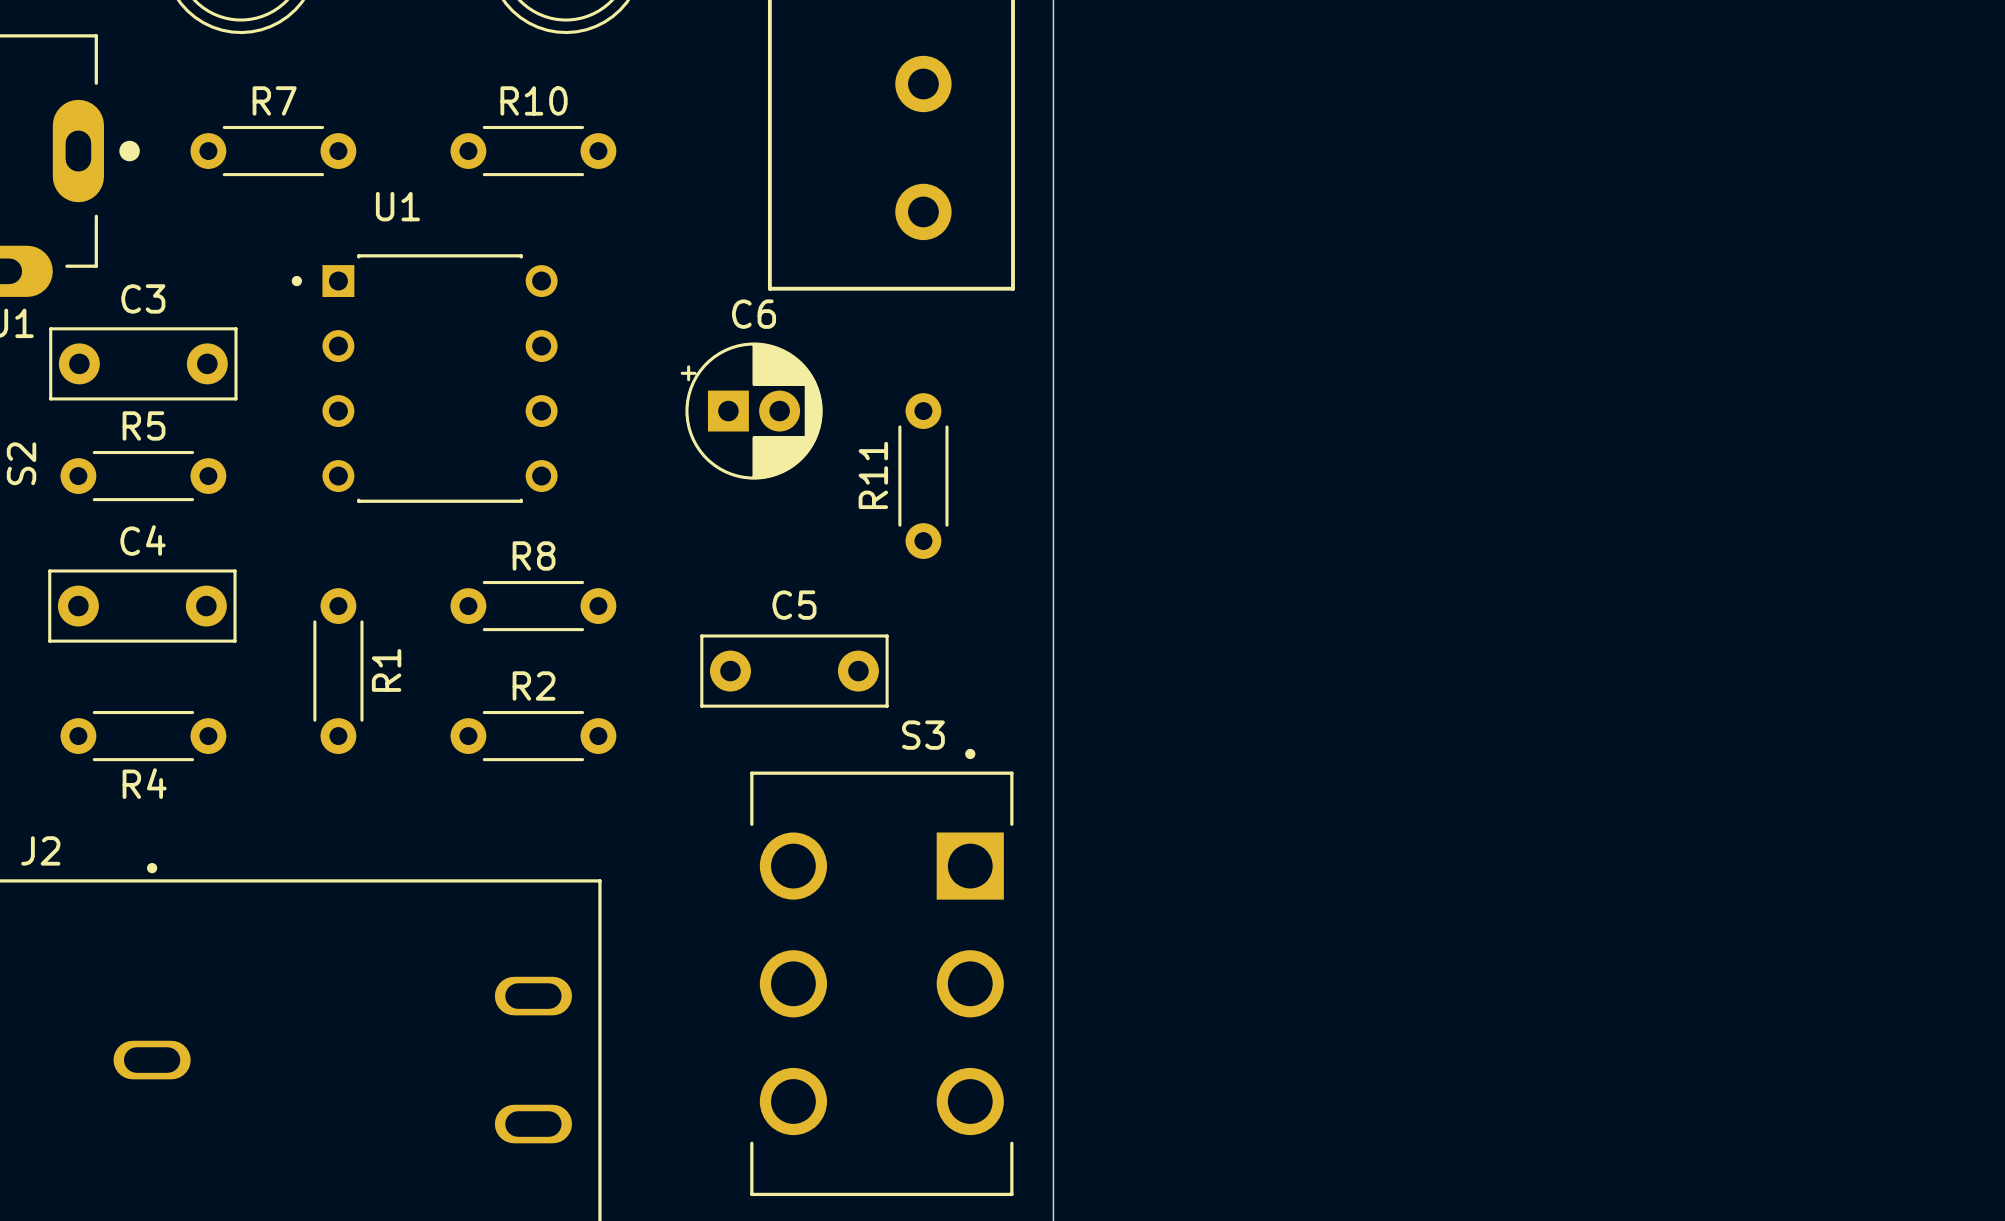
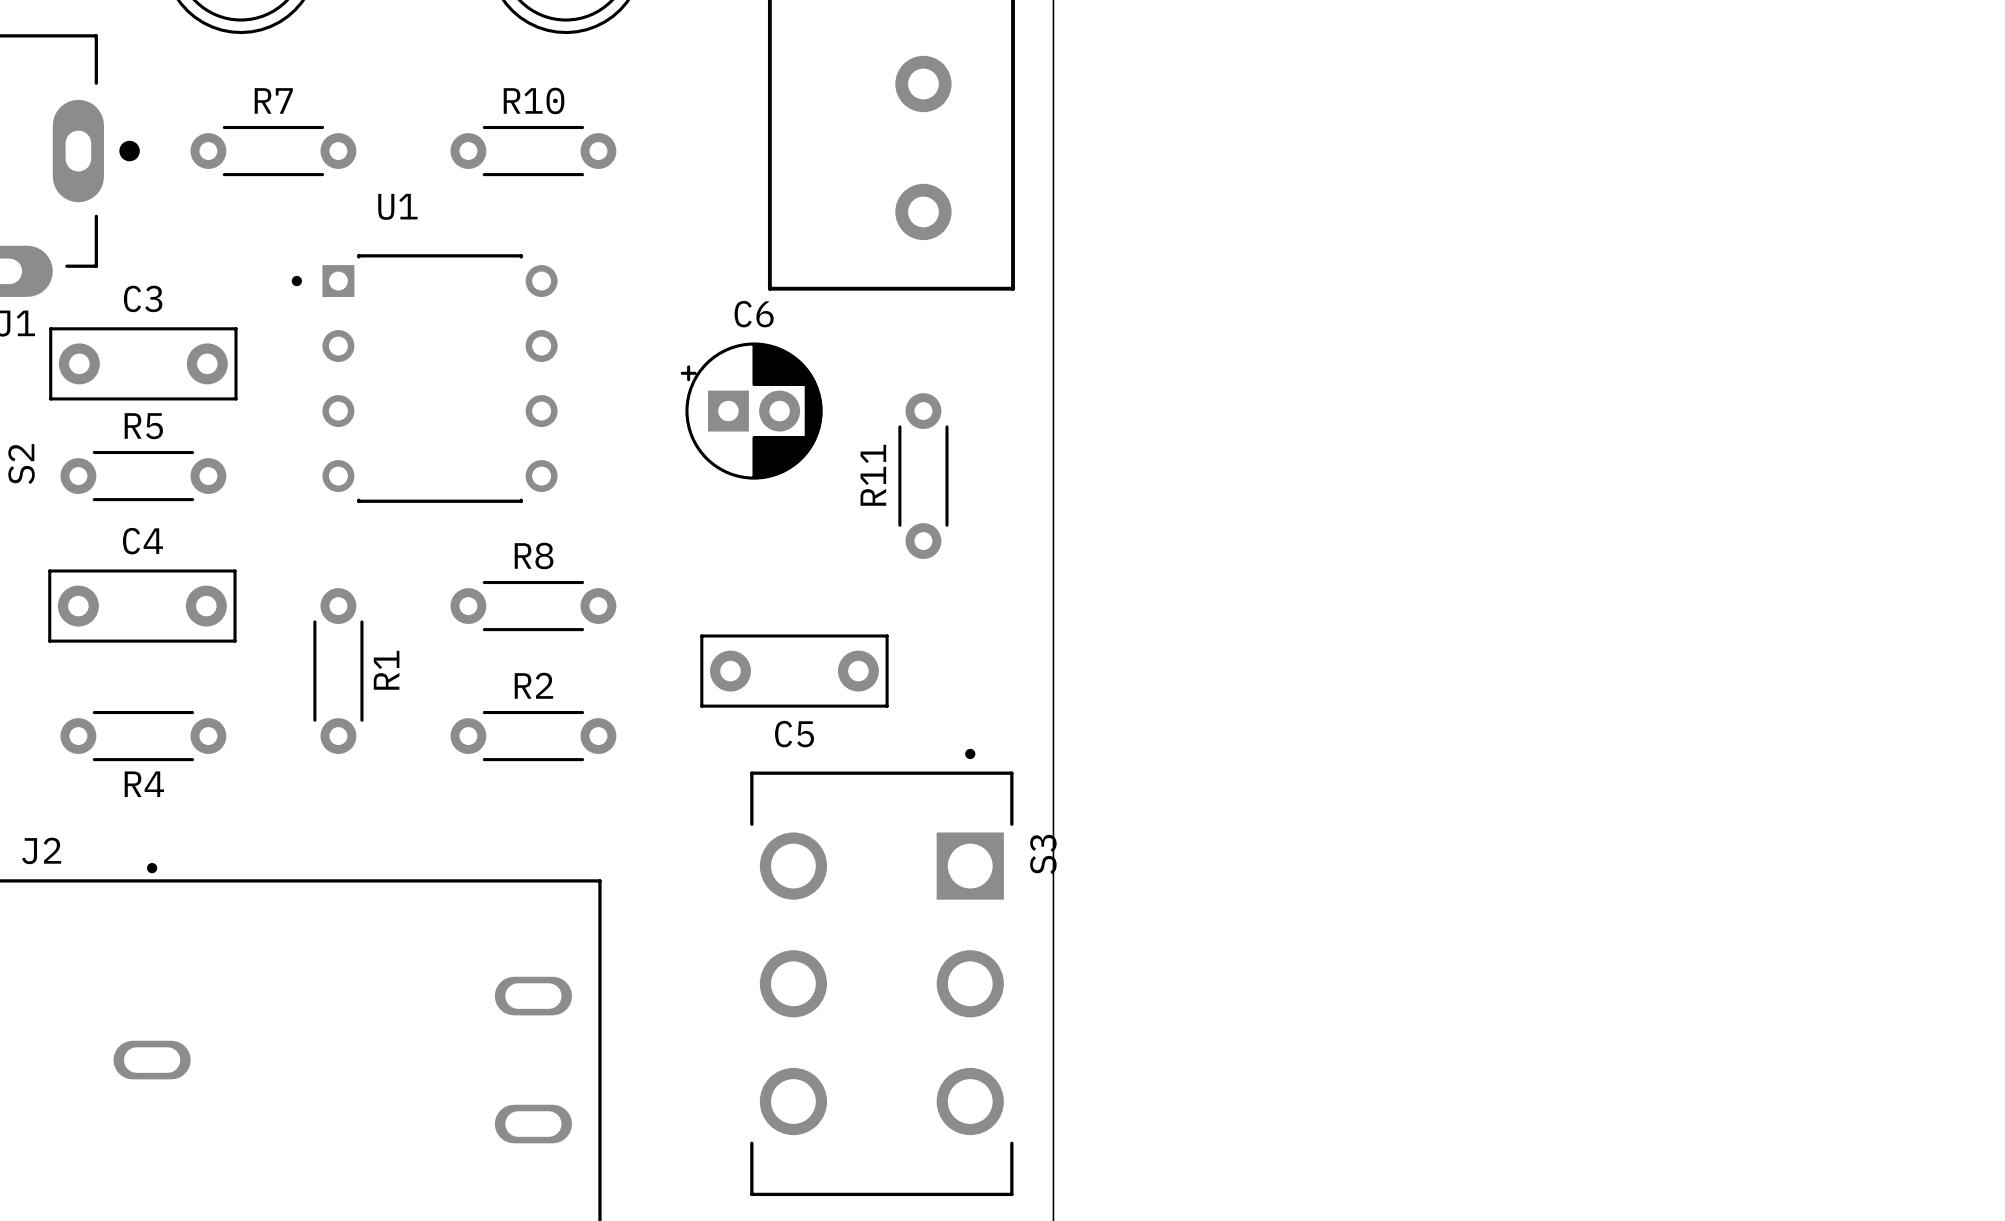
C5 name position: C5 (794, 605) -> C5 (794, 734)
S3 name rotation: 0° (923, 735) -> 90° counterclockwise (1043, 854)
S3 name position: S3 (923, 735) -> S3 (1043, 854)

